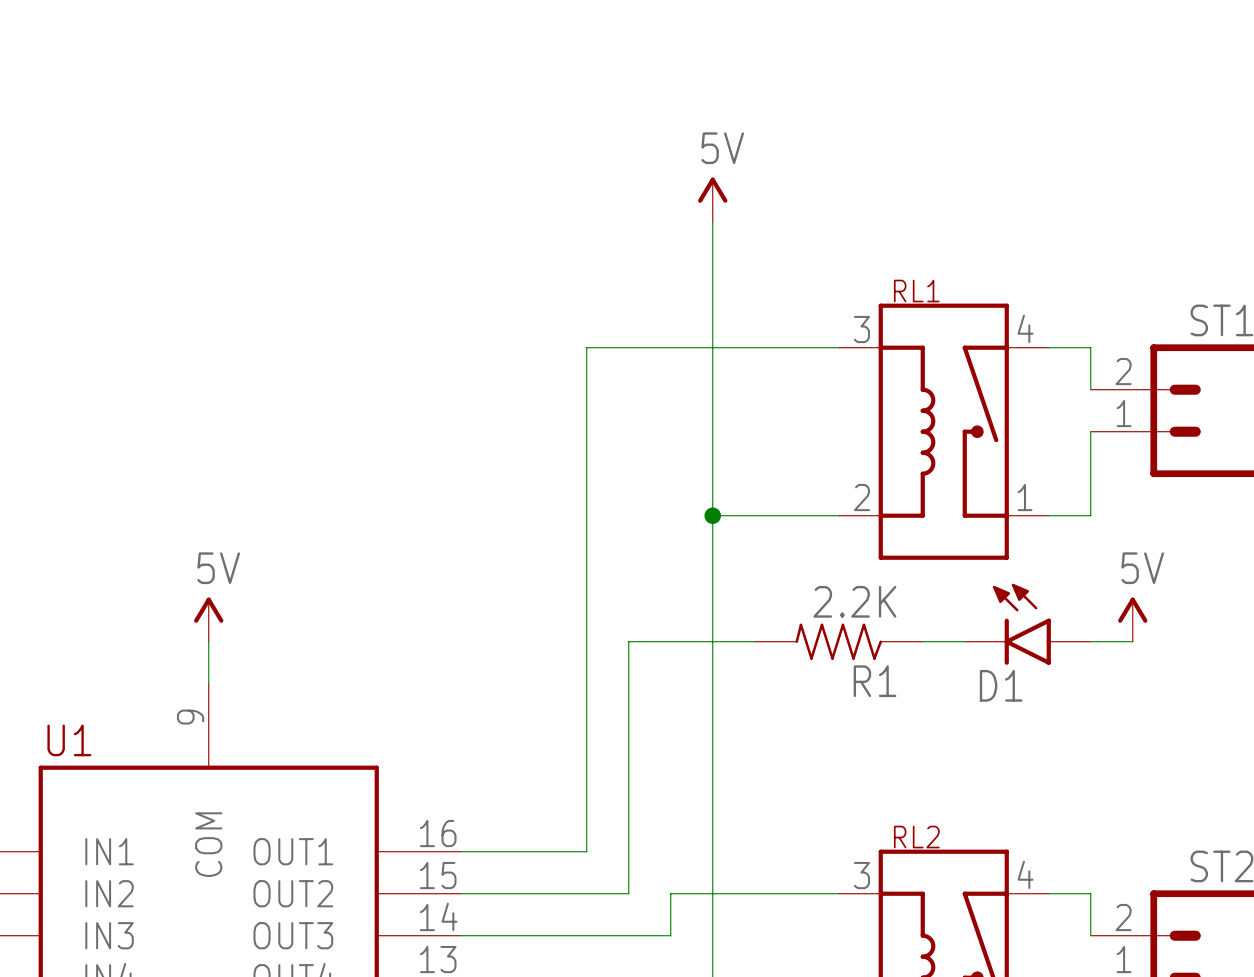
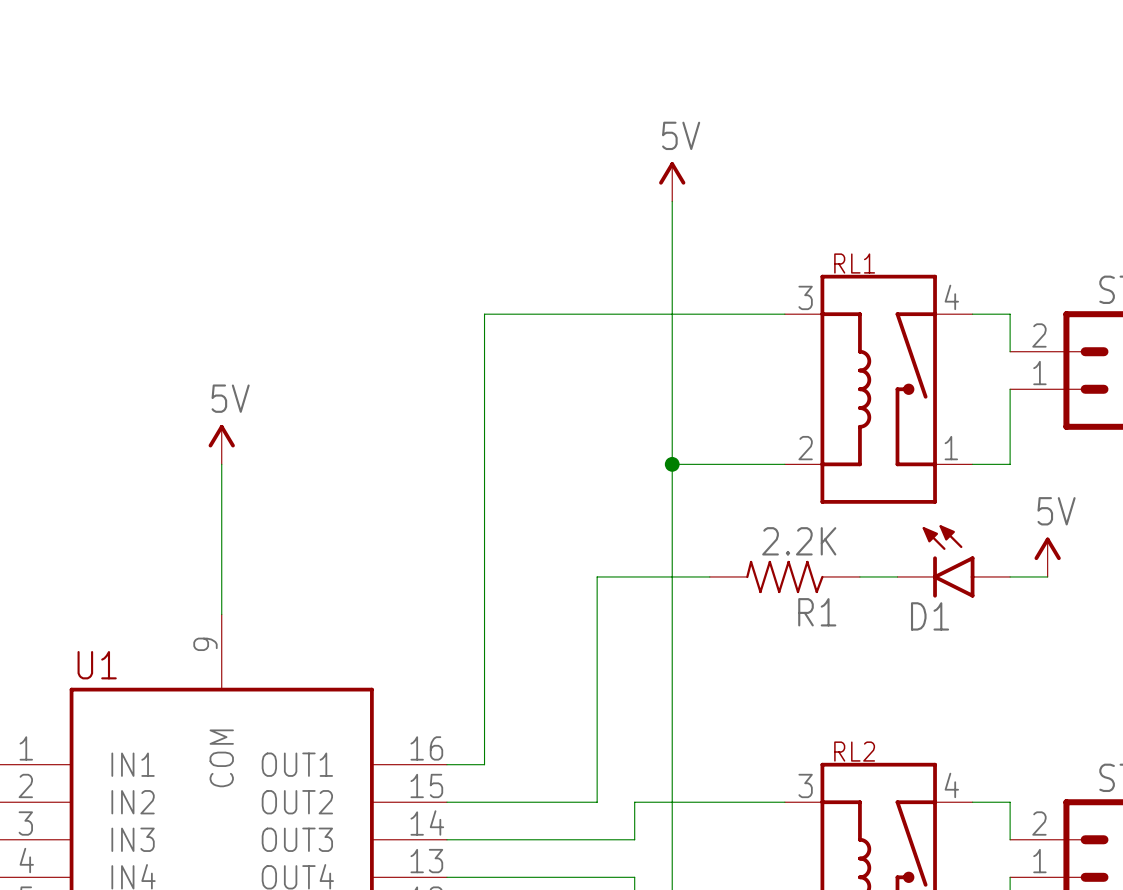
wire: (586, 347) (586, 851) (502, 851) -> (559, 314) (484, 314) (484, 764)
wire: none -> (221, 464) (221, 576)
power symbol position: 5V (208, 619) -> 5V (221, 444)

